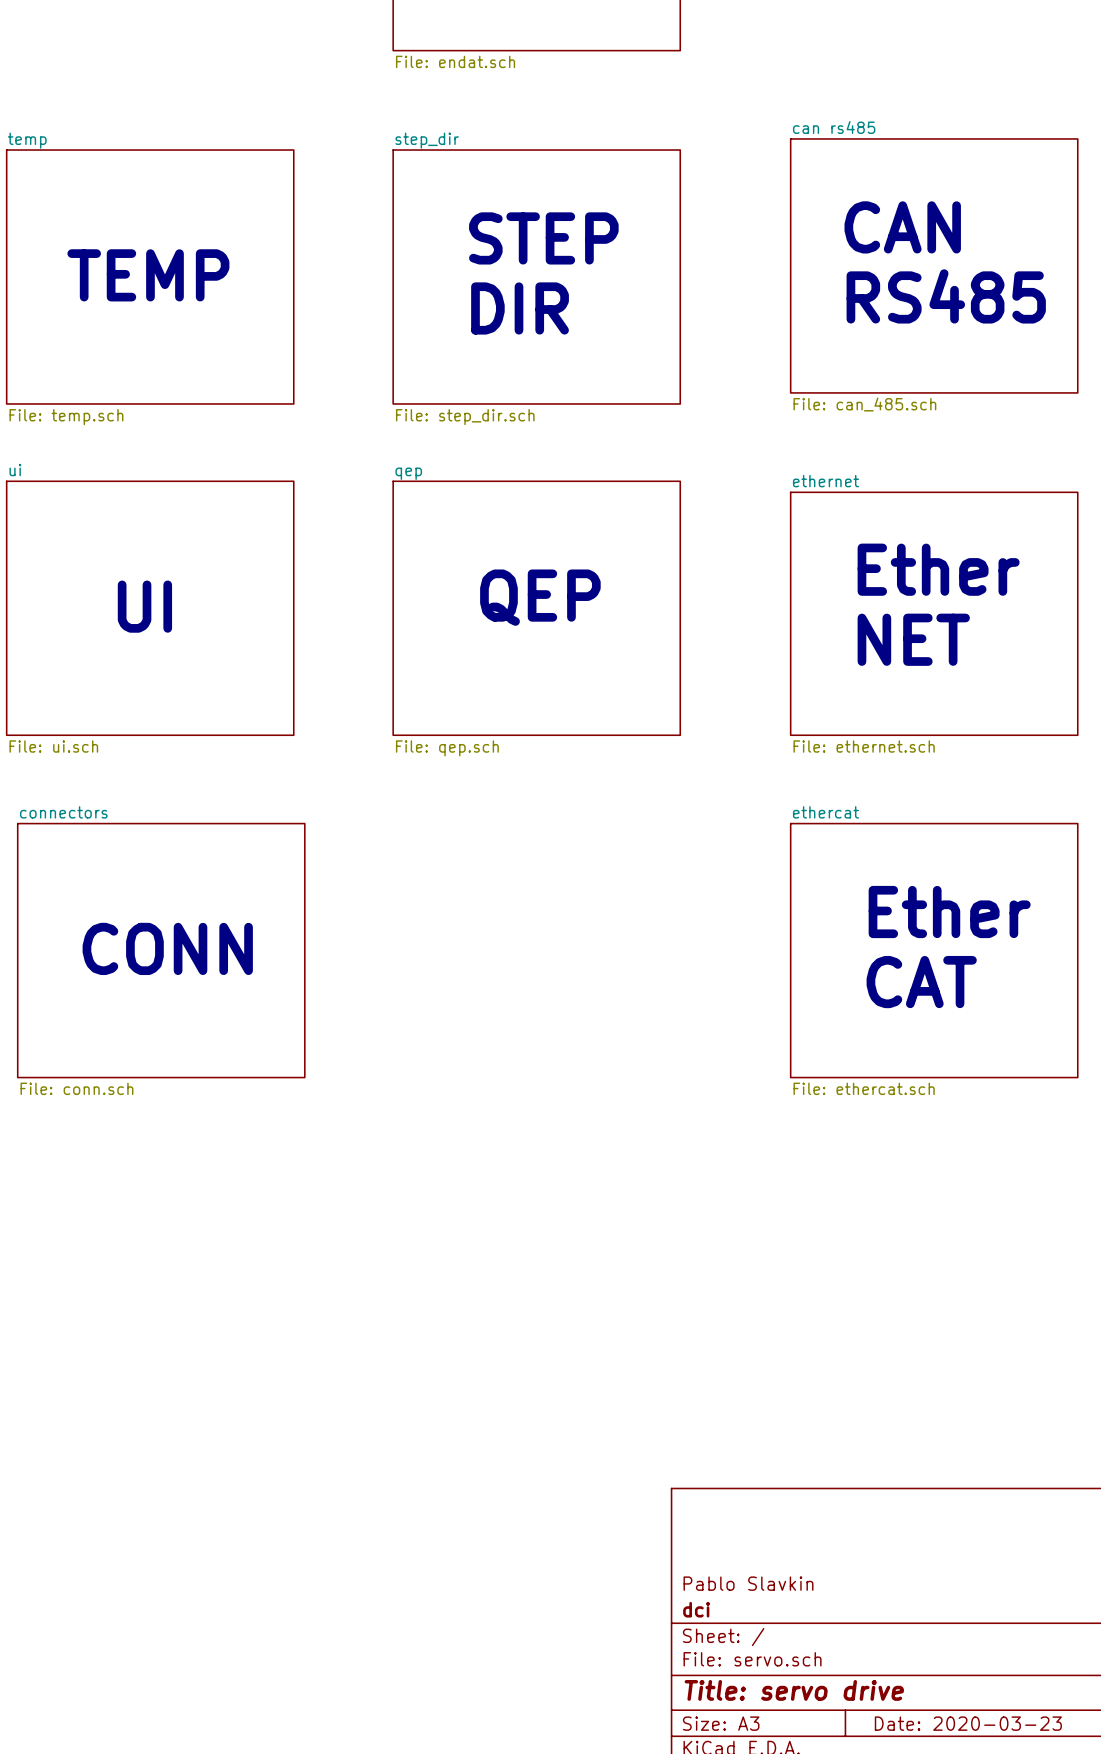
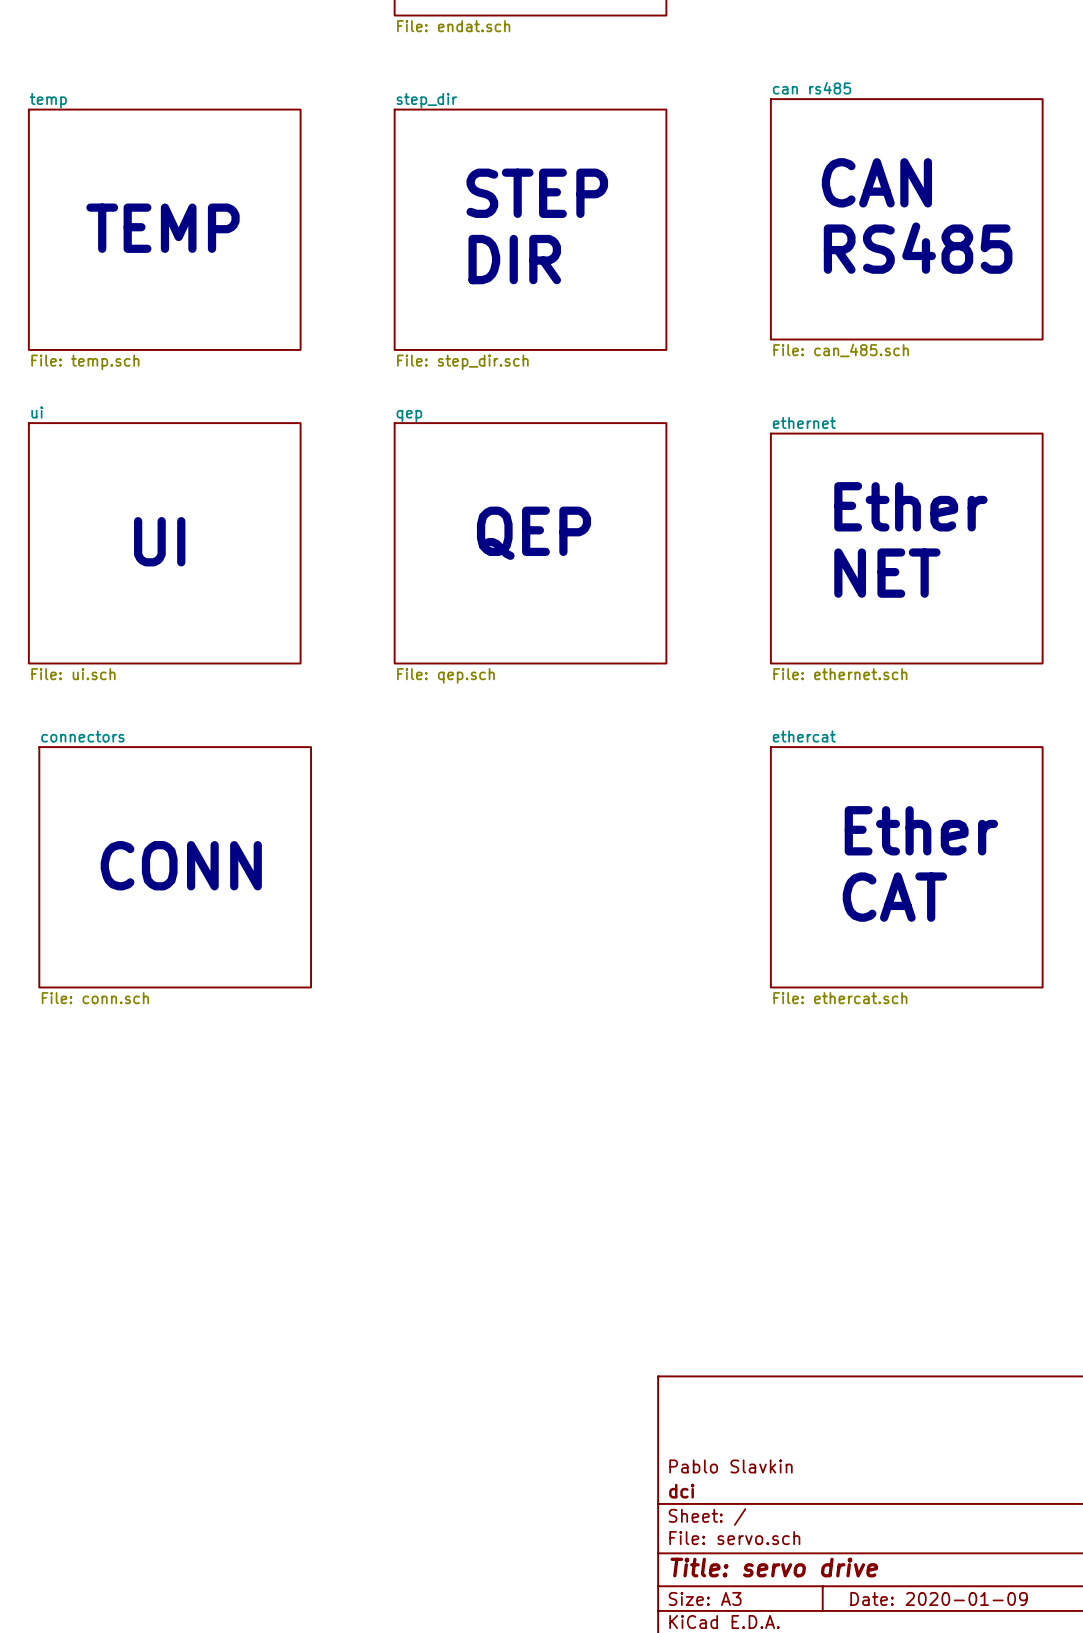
title block: Date: 2020-03-23 (968, 1723) -> Date: 2020-01-09 (939, 1598)

